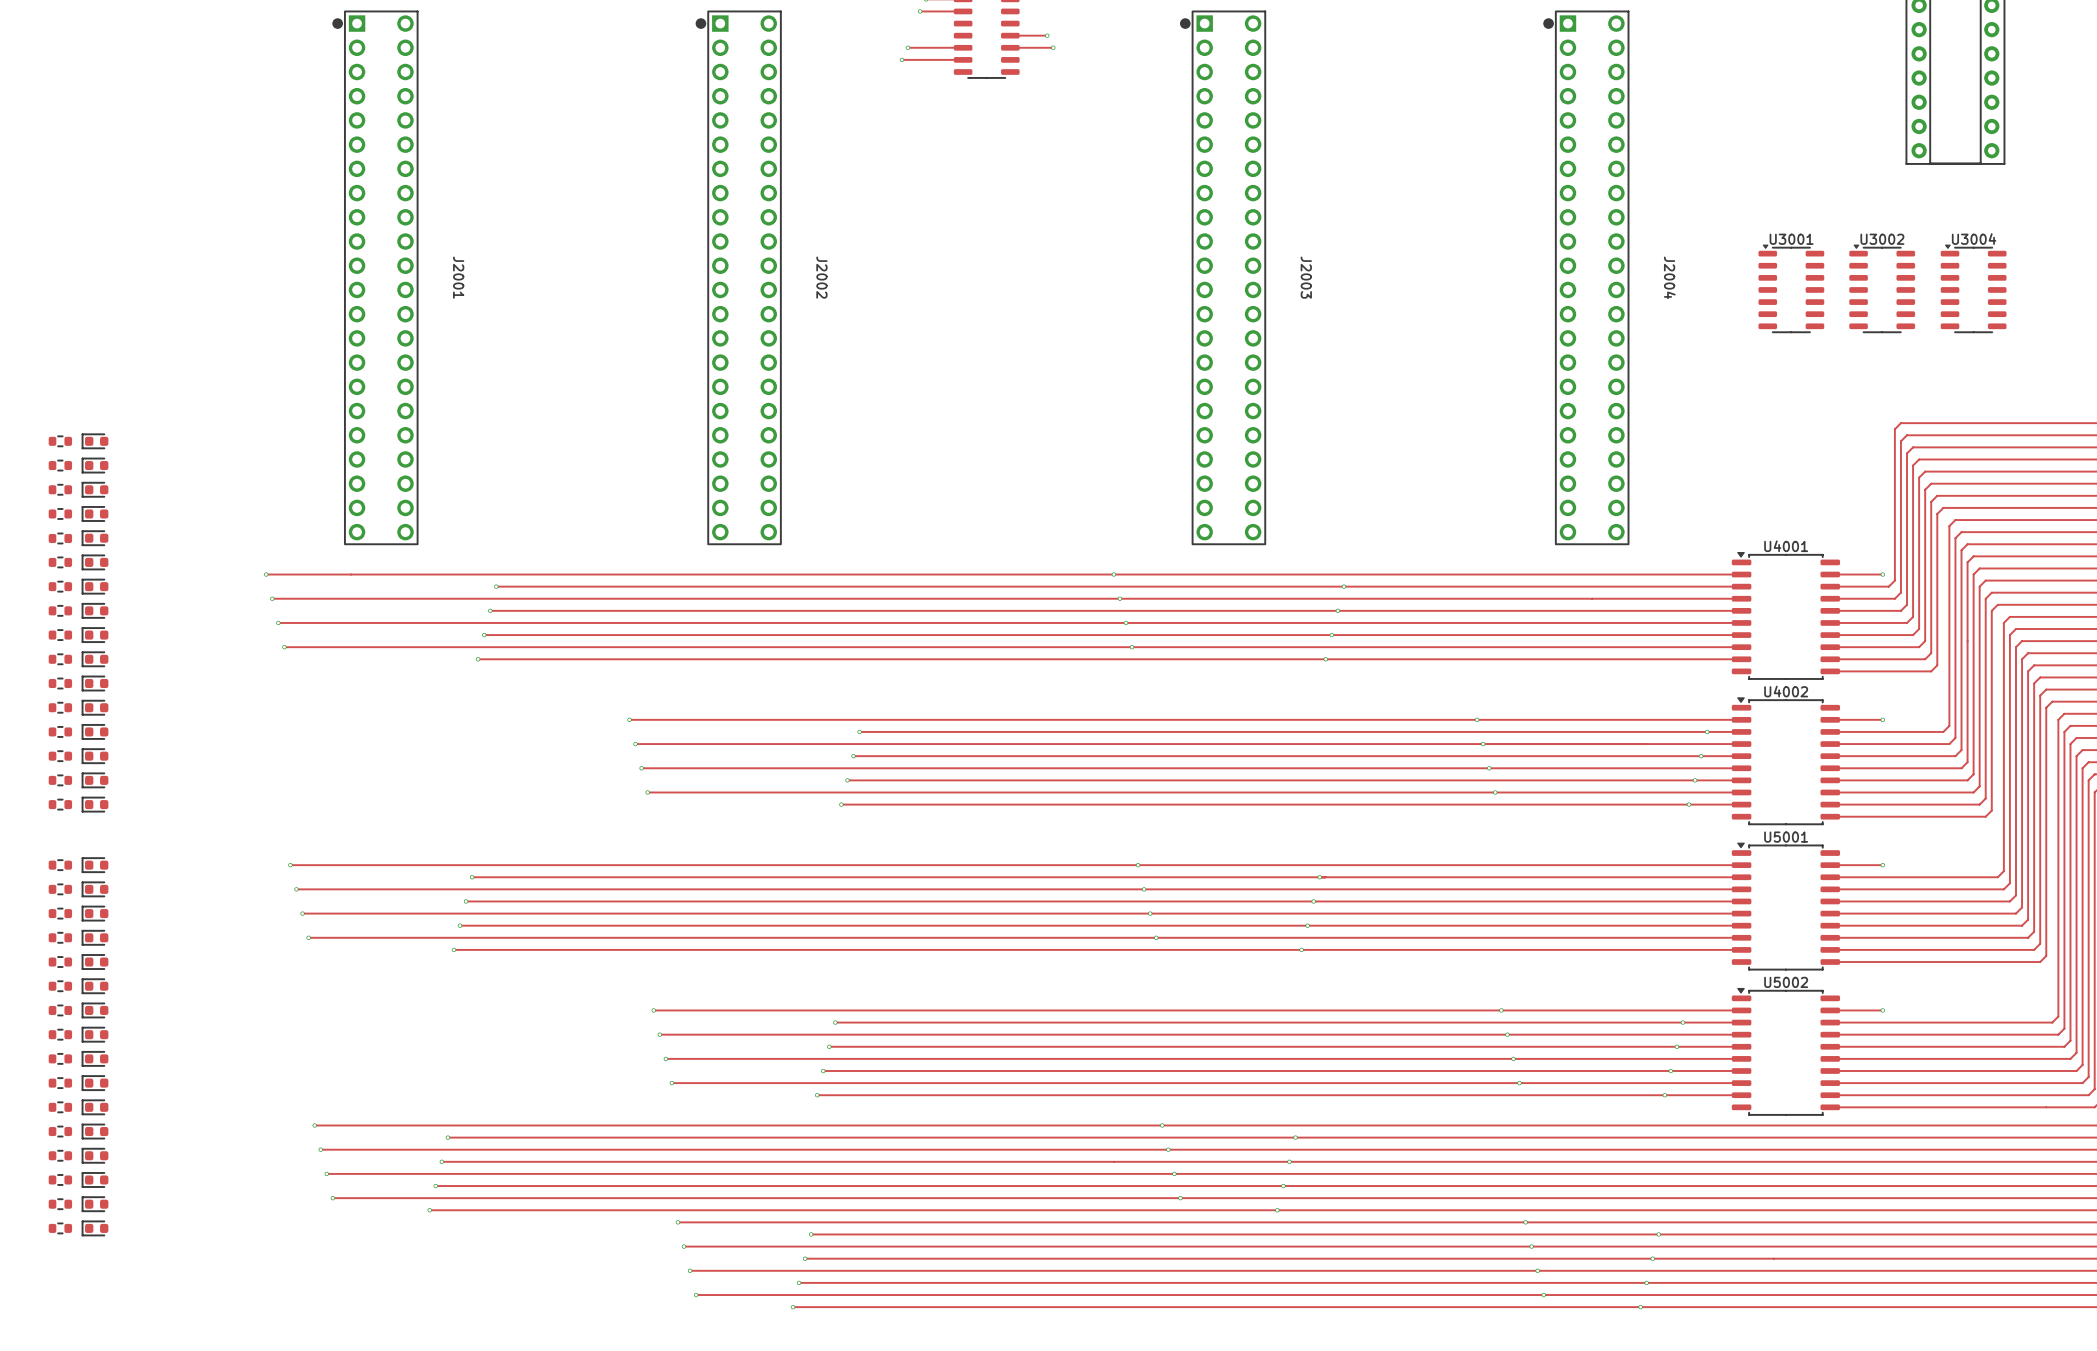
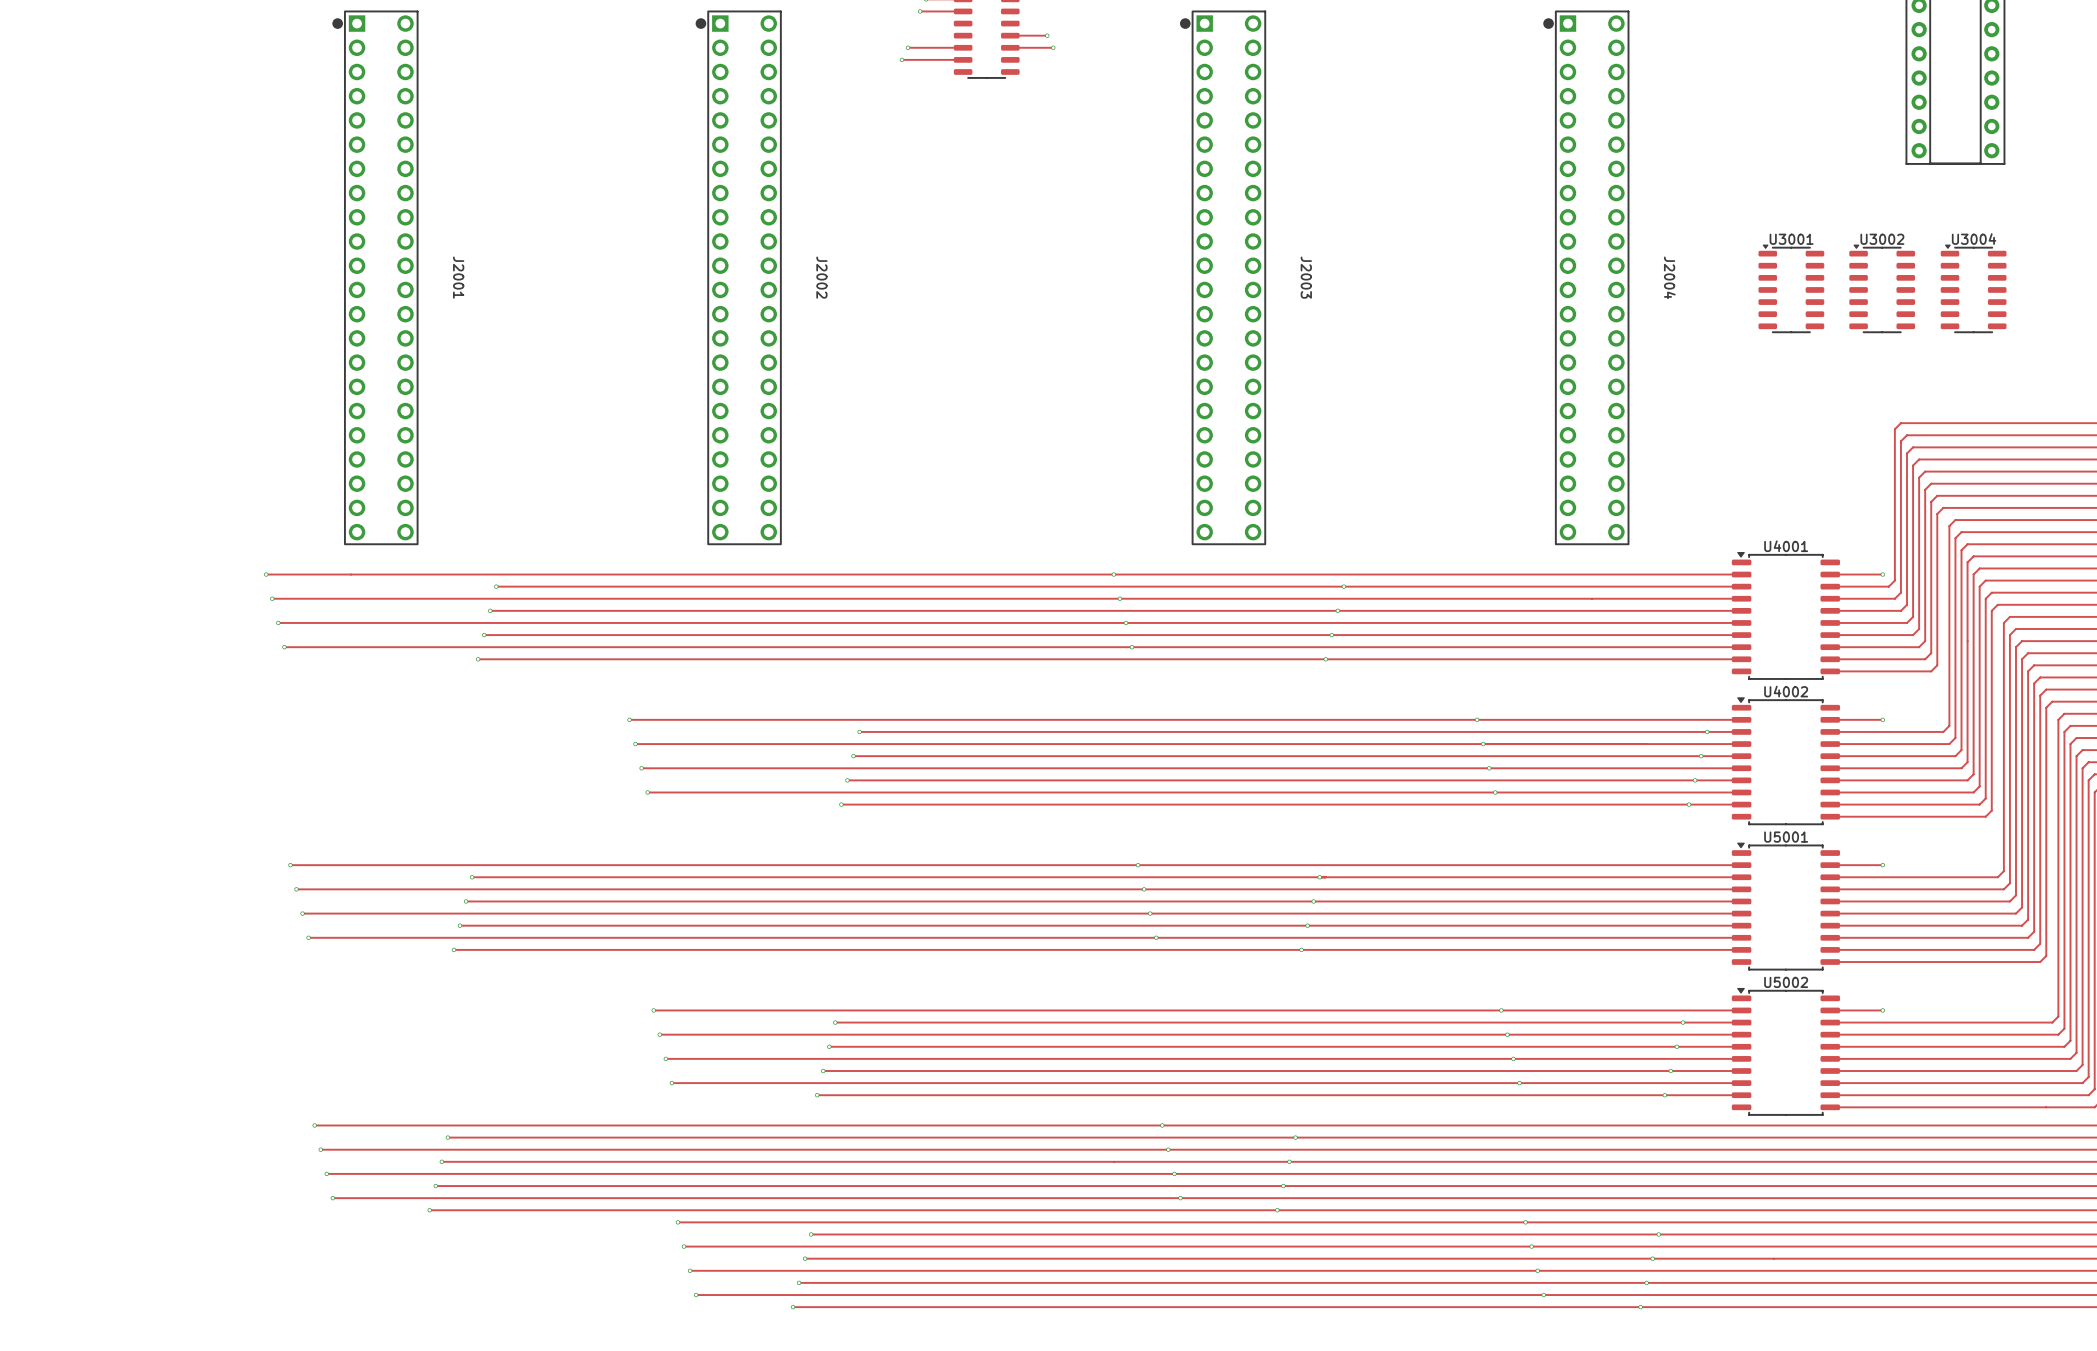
part: (60, 441) -> none
part: (95, 441) -> none
part: (60, 465) -> none
part: (95, 465) -> none
part: (60, 489) -> none
part: (95, 489) -> none
part: (60, 513) -> none
part: (95, 513) -> none
part: (60, 538) -> none
part: (95, 538) -> none
part: (60, 562) -> none
part: (95, 562) -> none
part: (60, 586) -> none
part: (95, 586) -> none
part: (60, 610) -> none
part: (95, 610) -> none
part: (60, 635) -> none
part: (95, 635) -> none
part: (60, 659) -> none
part: (95, 659) -> none
part: (60, 683) -> none
part: (95, 683) -> none
part: (60, 707) -> none
part: (95, 707) -> none
part: (60, 731) -> none
part: (95, 731) -> none
part: (60, 756) -> none
part: (95, 756) -> none
part: (60, 780) -> none
part: (95, 780) -> none
part: (60, 804) -> none
part: (95, 804) -> none
part: (60, 865) -> none
part: (95, 865) -> none
part: (60, 889) -> none
part: (95, 889) -> none
part: (60, 913) -> none
part: (95, 913) -> none
part: (60, 937) -> none
part: (95, 937) -> none
part: (60, 962) -> none
part: (95, 962) -> none
part: (60, 986) -> none
part: (95, 986) -> none
part: (60, 1010) -> none
part: (95, 1010) -> none
part: (60, 1034) -> none
part: (95, 1034) -> none
part: (60, 1058) -> none
part: (95, 1058) -> none
part: (60, 1083) -> none
part: (95, 1083) -> none
part: (60, 1107) -> none
part: (95, 1107) -> none
part: (60, 1131) -> none
part: (95, 1131) -> none
part: (60, 1155) -> none
part: (95, 1155) -> none
part: (60, 1179) -> none
part: (95, 1179) -> none
part: (60, 1204) -> none
part: (95, 1204) -> none
part: (60, 1228) -> none
part: (95, 1228) -> none

